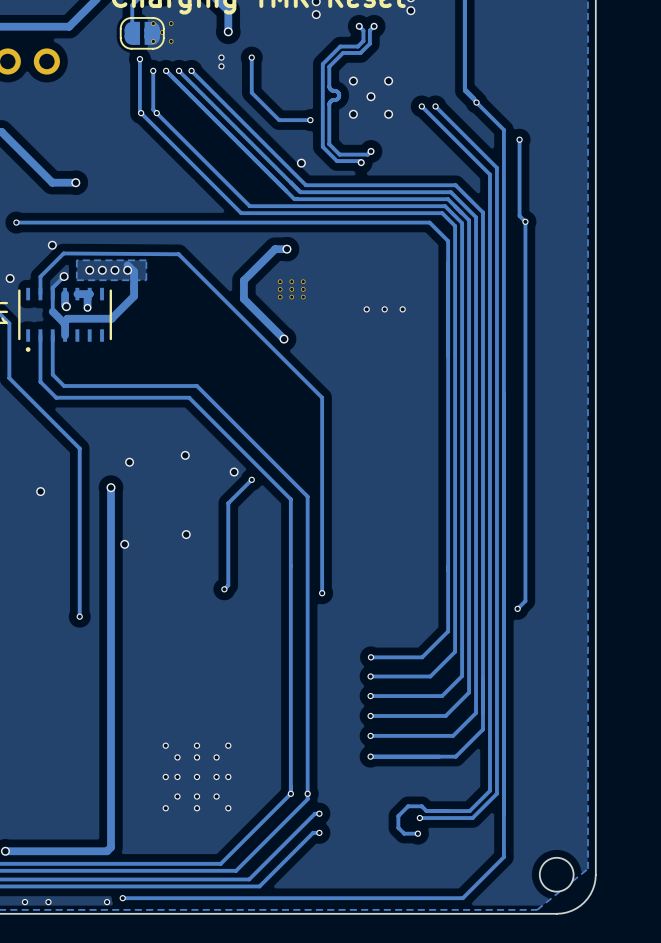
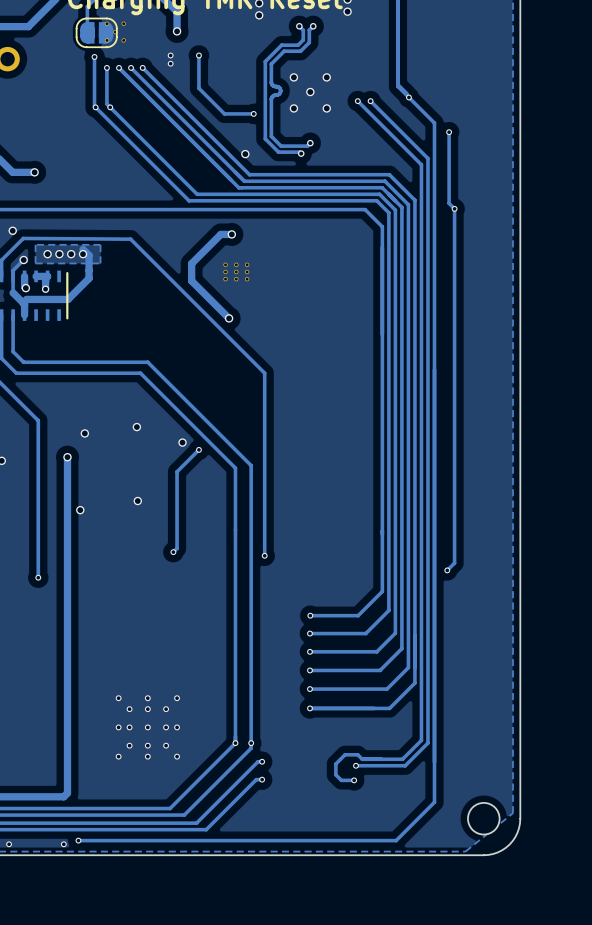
via: (366, 309) -> none
via: (384, 309) -> none
via: (402, 309) -> none

